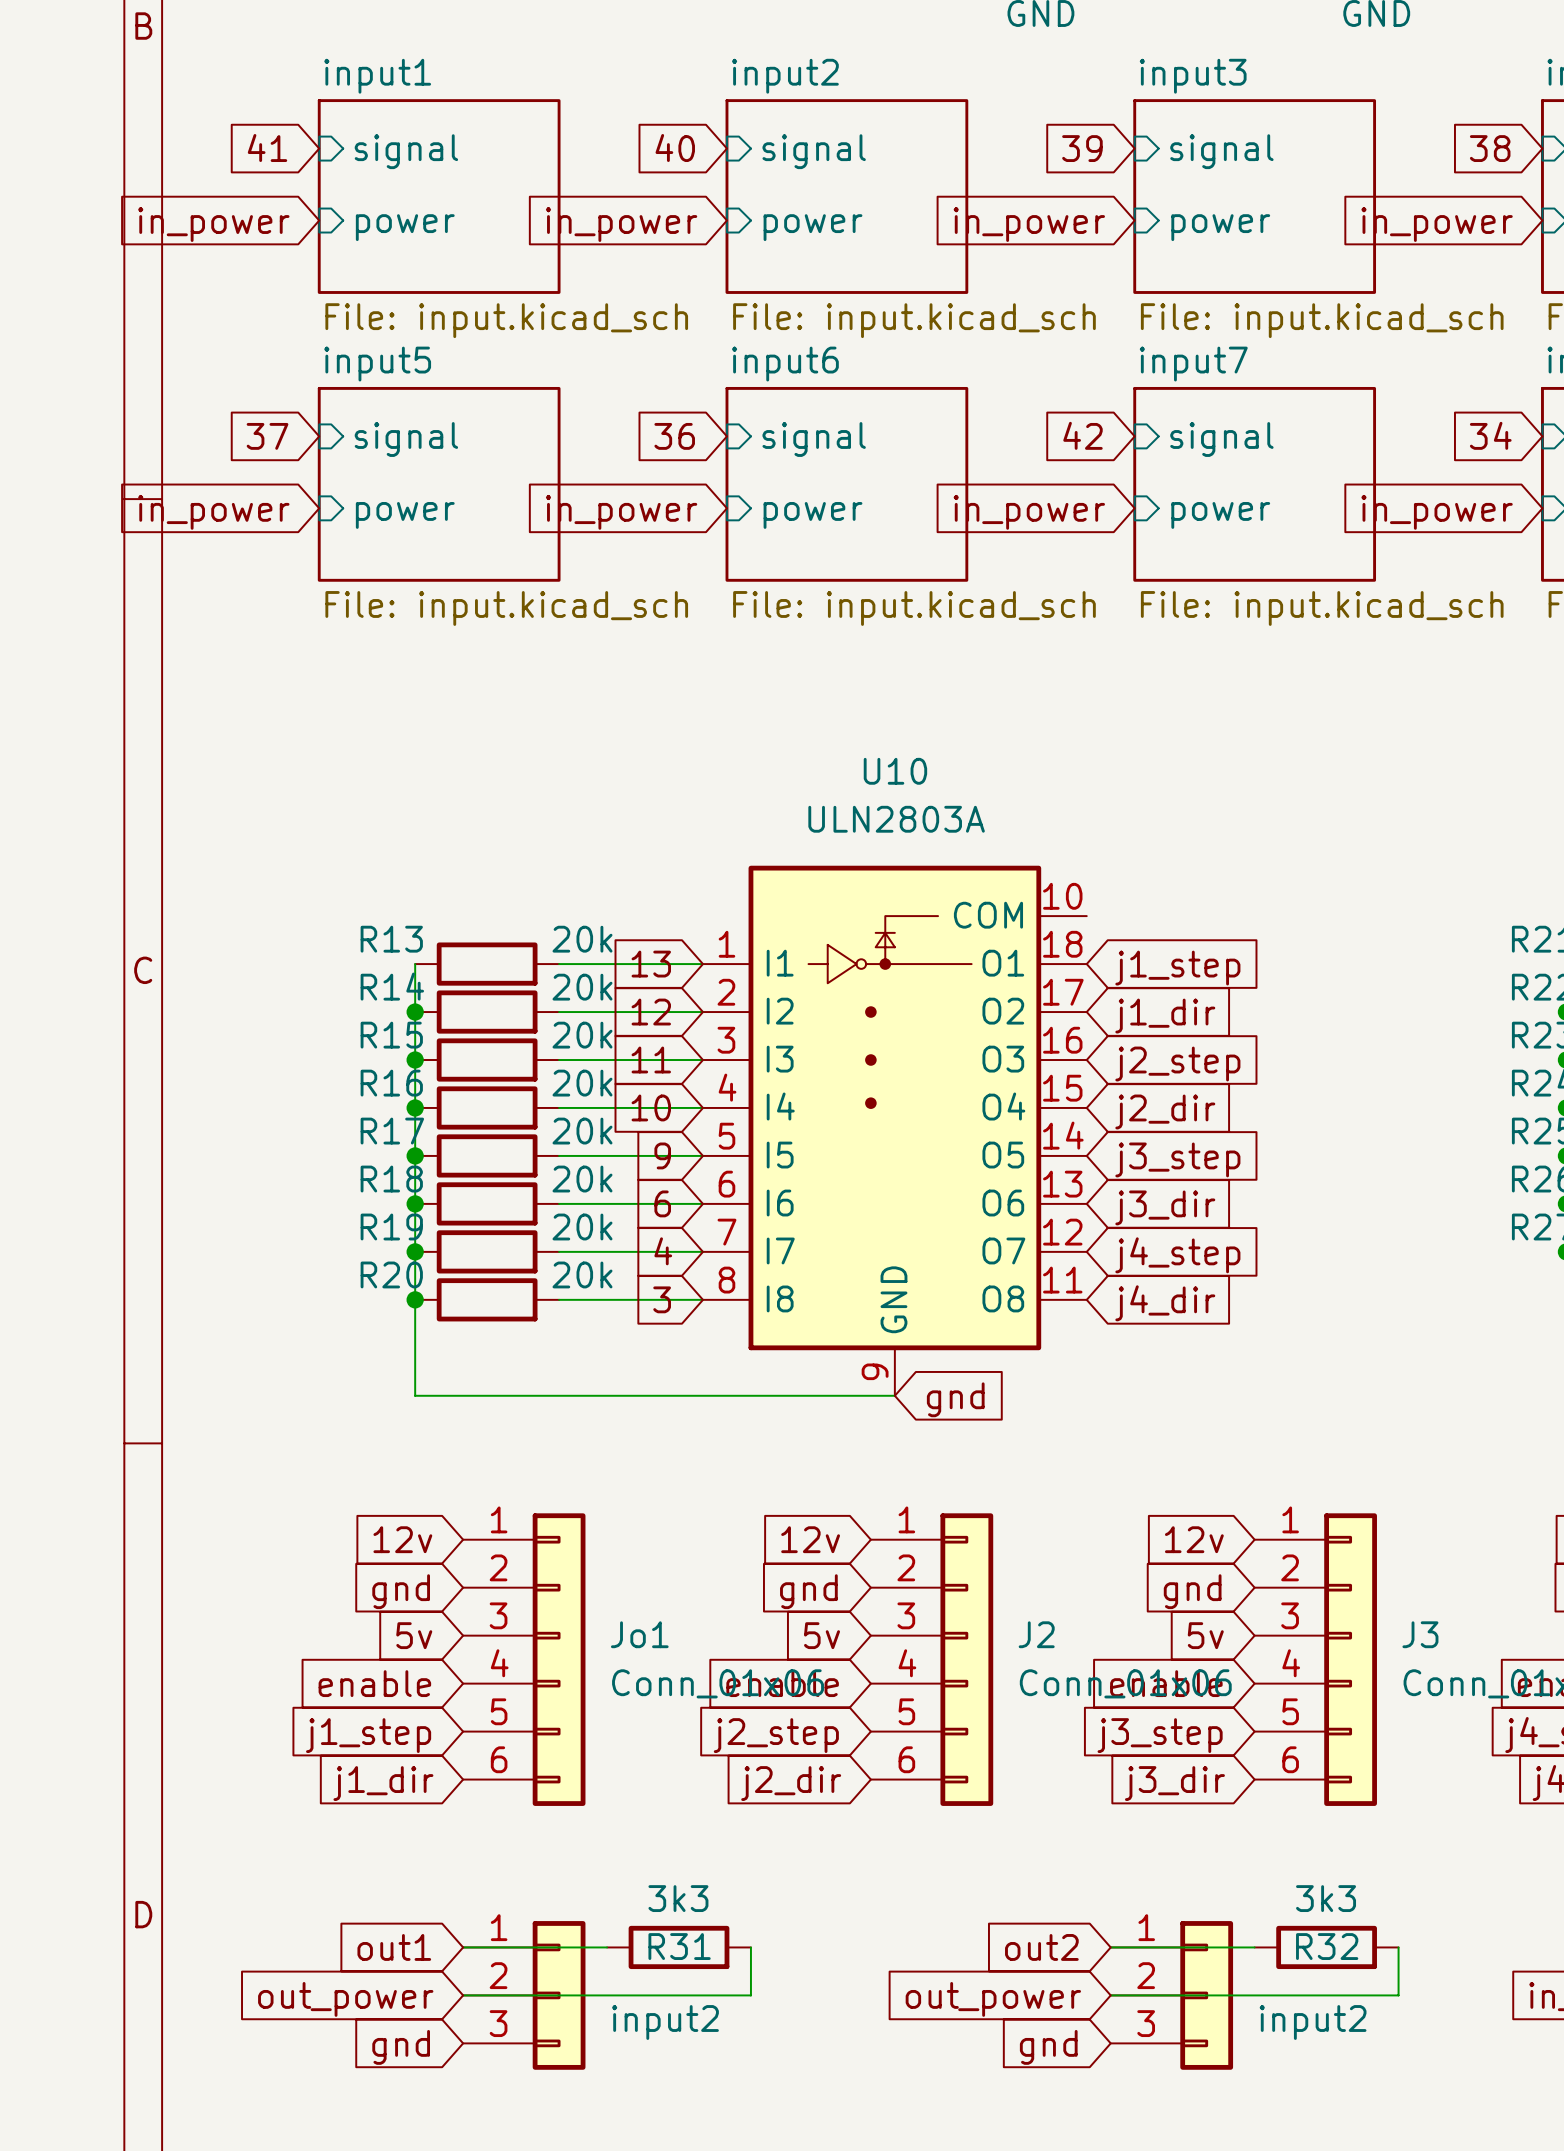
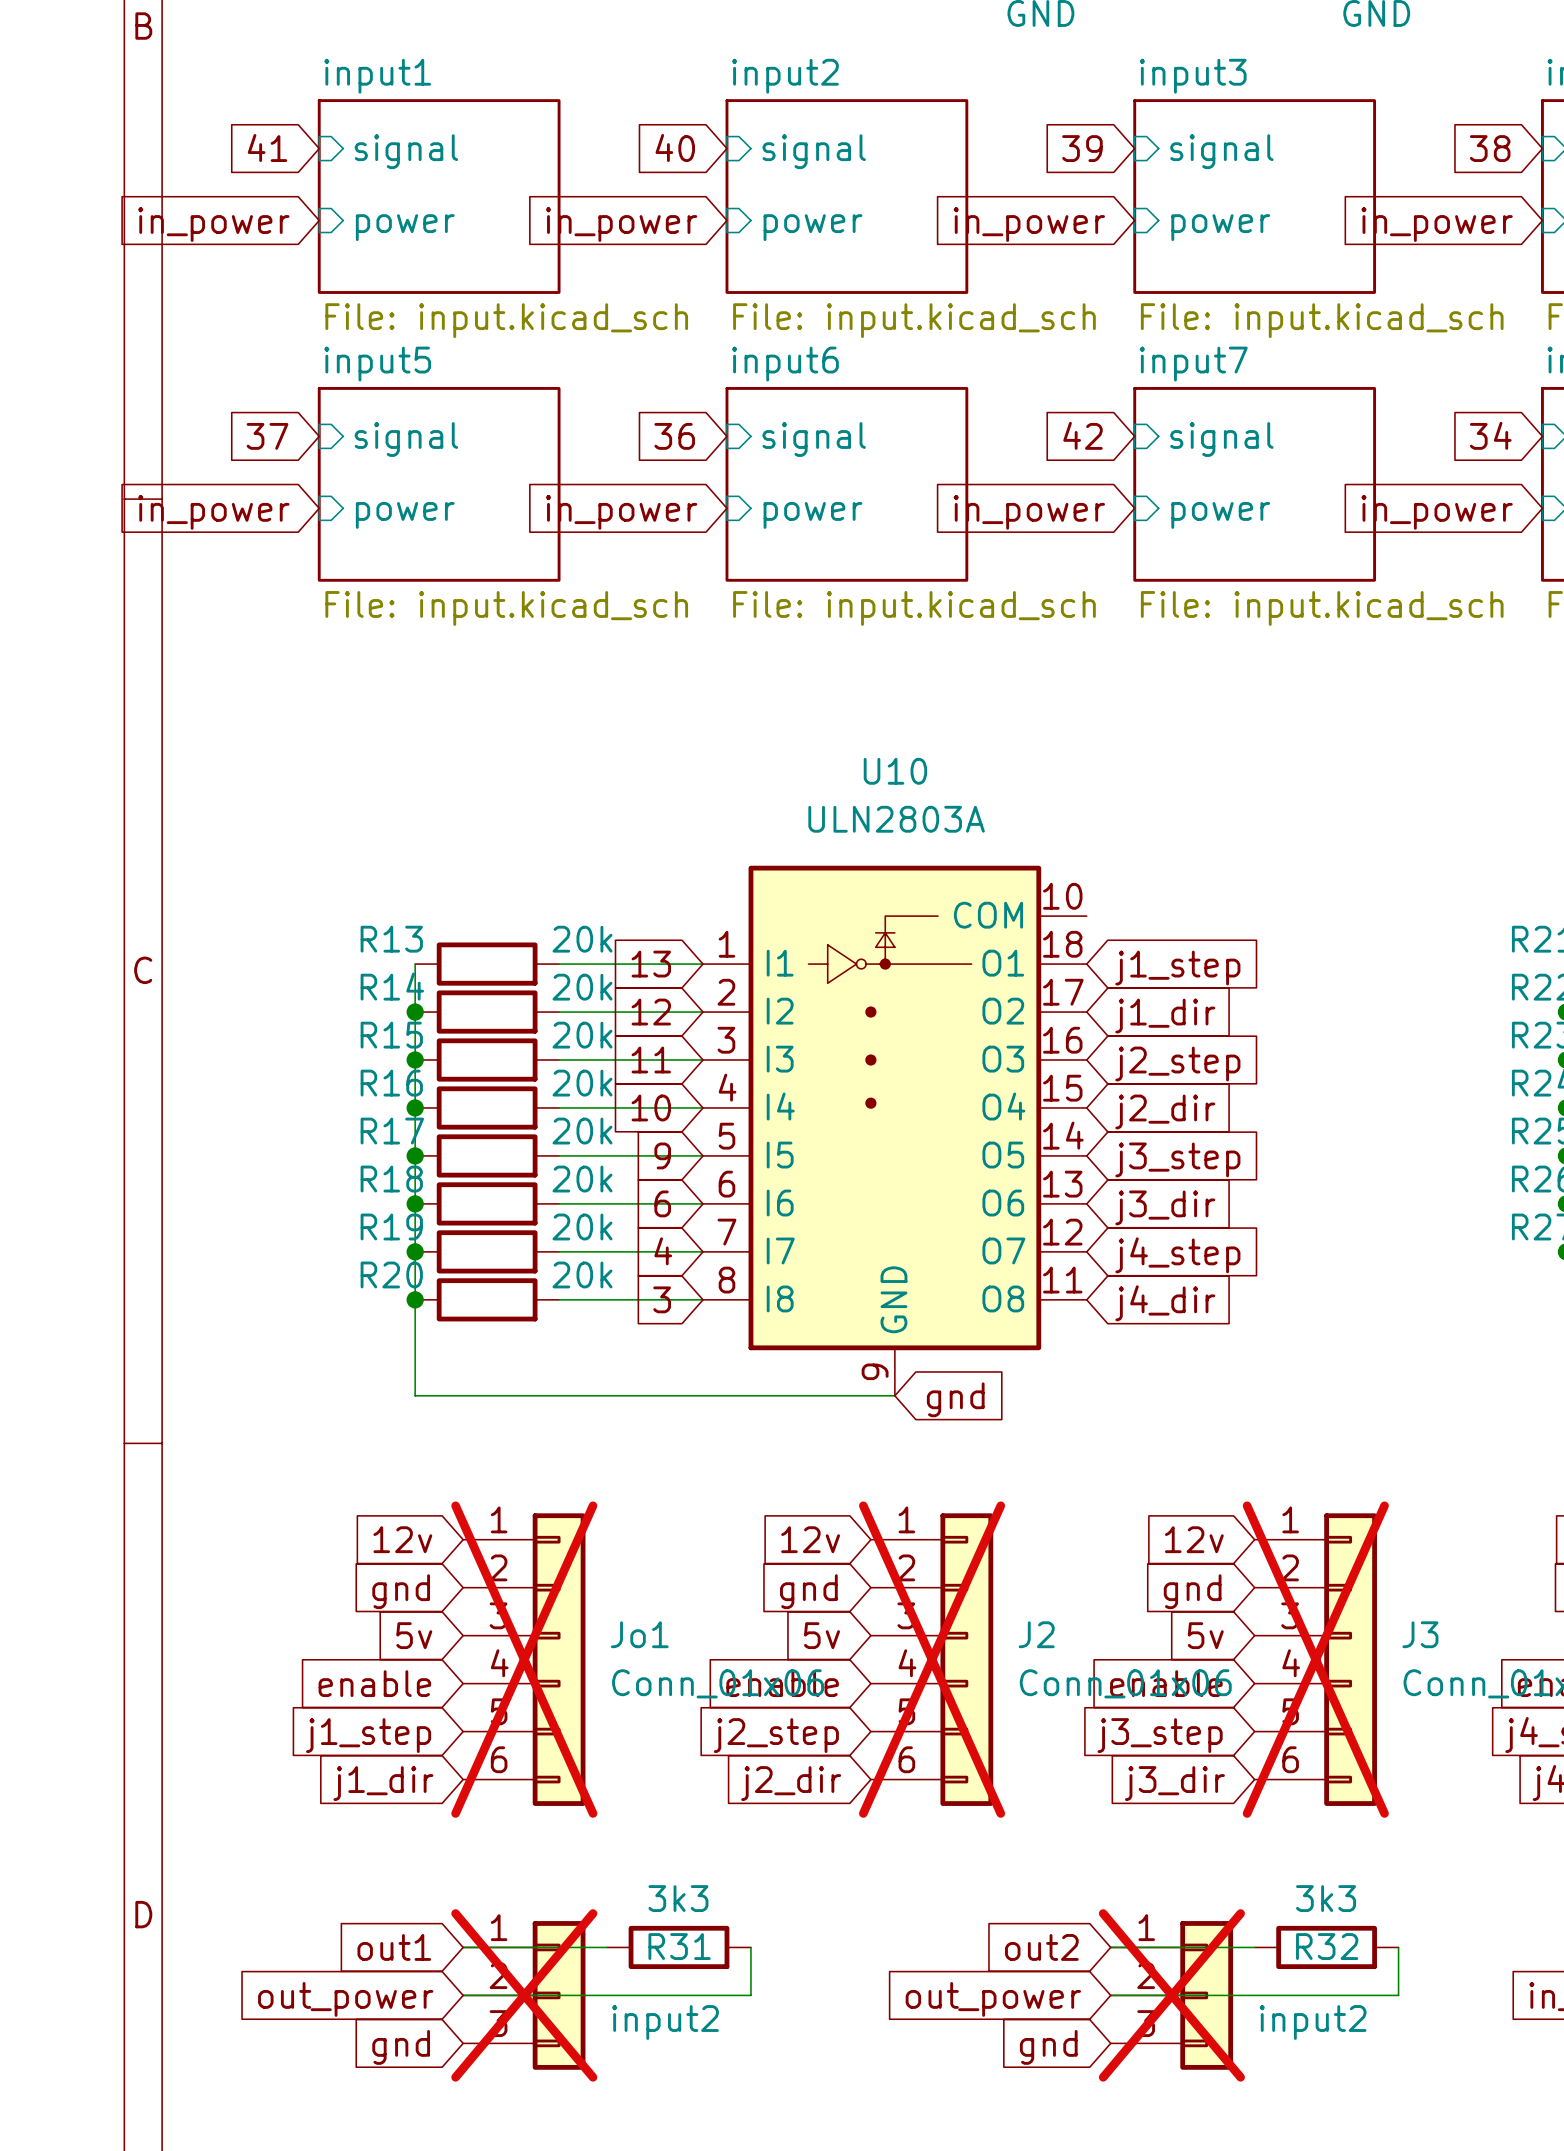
Jo1 do-not-place cross: none -> (524, 1659)
J2 do-not-place cross: none -> (932, 1659)
J3 do-not-place cross: none -> (1315, 1659)
input2 do-not-place cross: none -> (524, 1995)
input2 do-not-place cross: none -> (1171, 1995)

